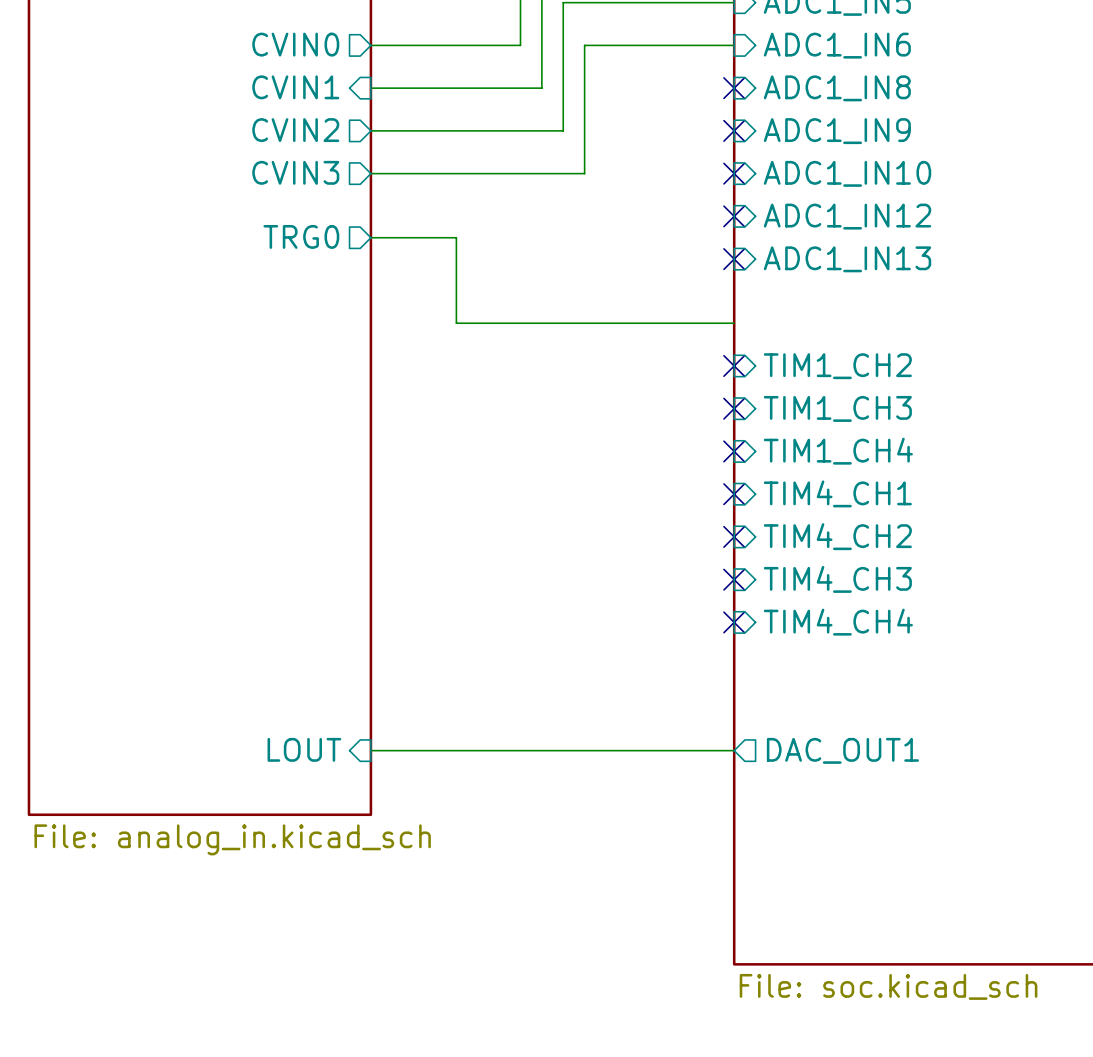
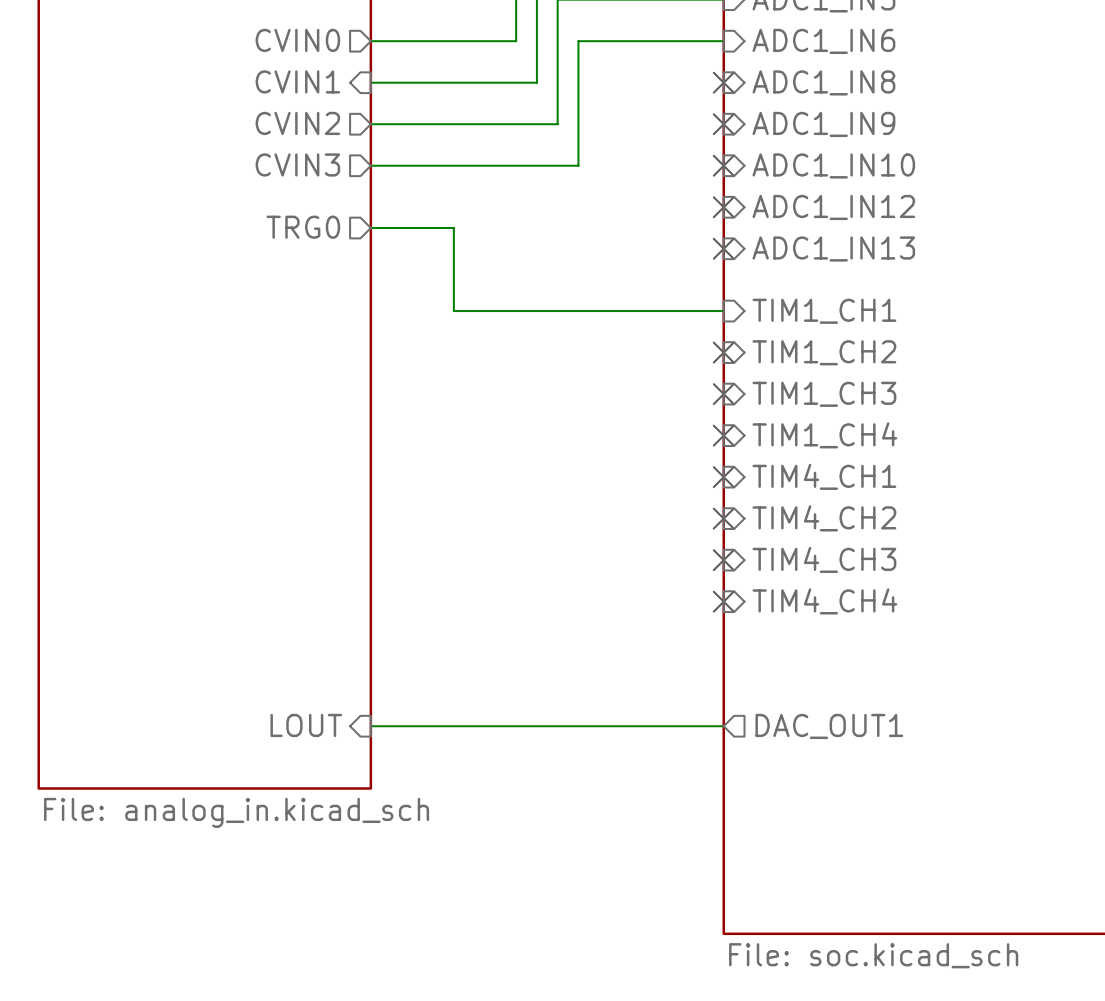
sheet pin: none -> TIM1_CH1 (824, 311)

